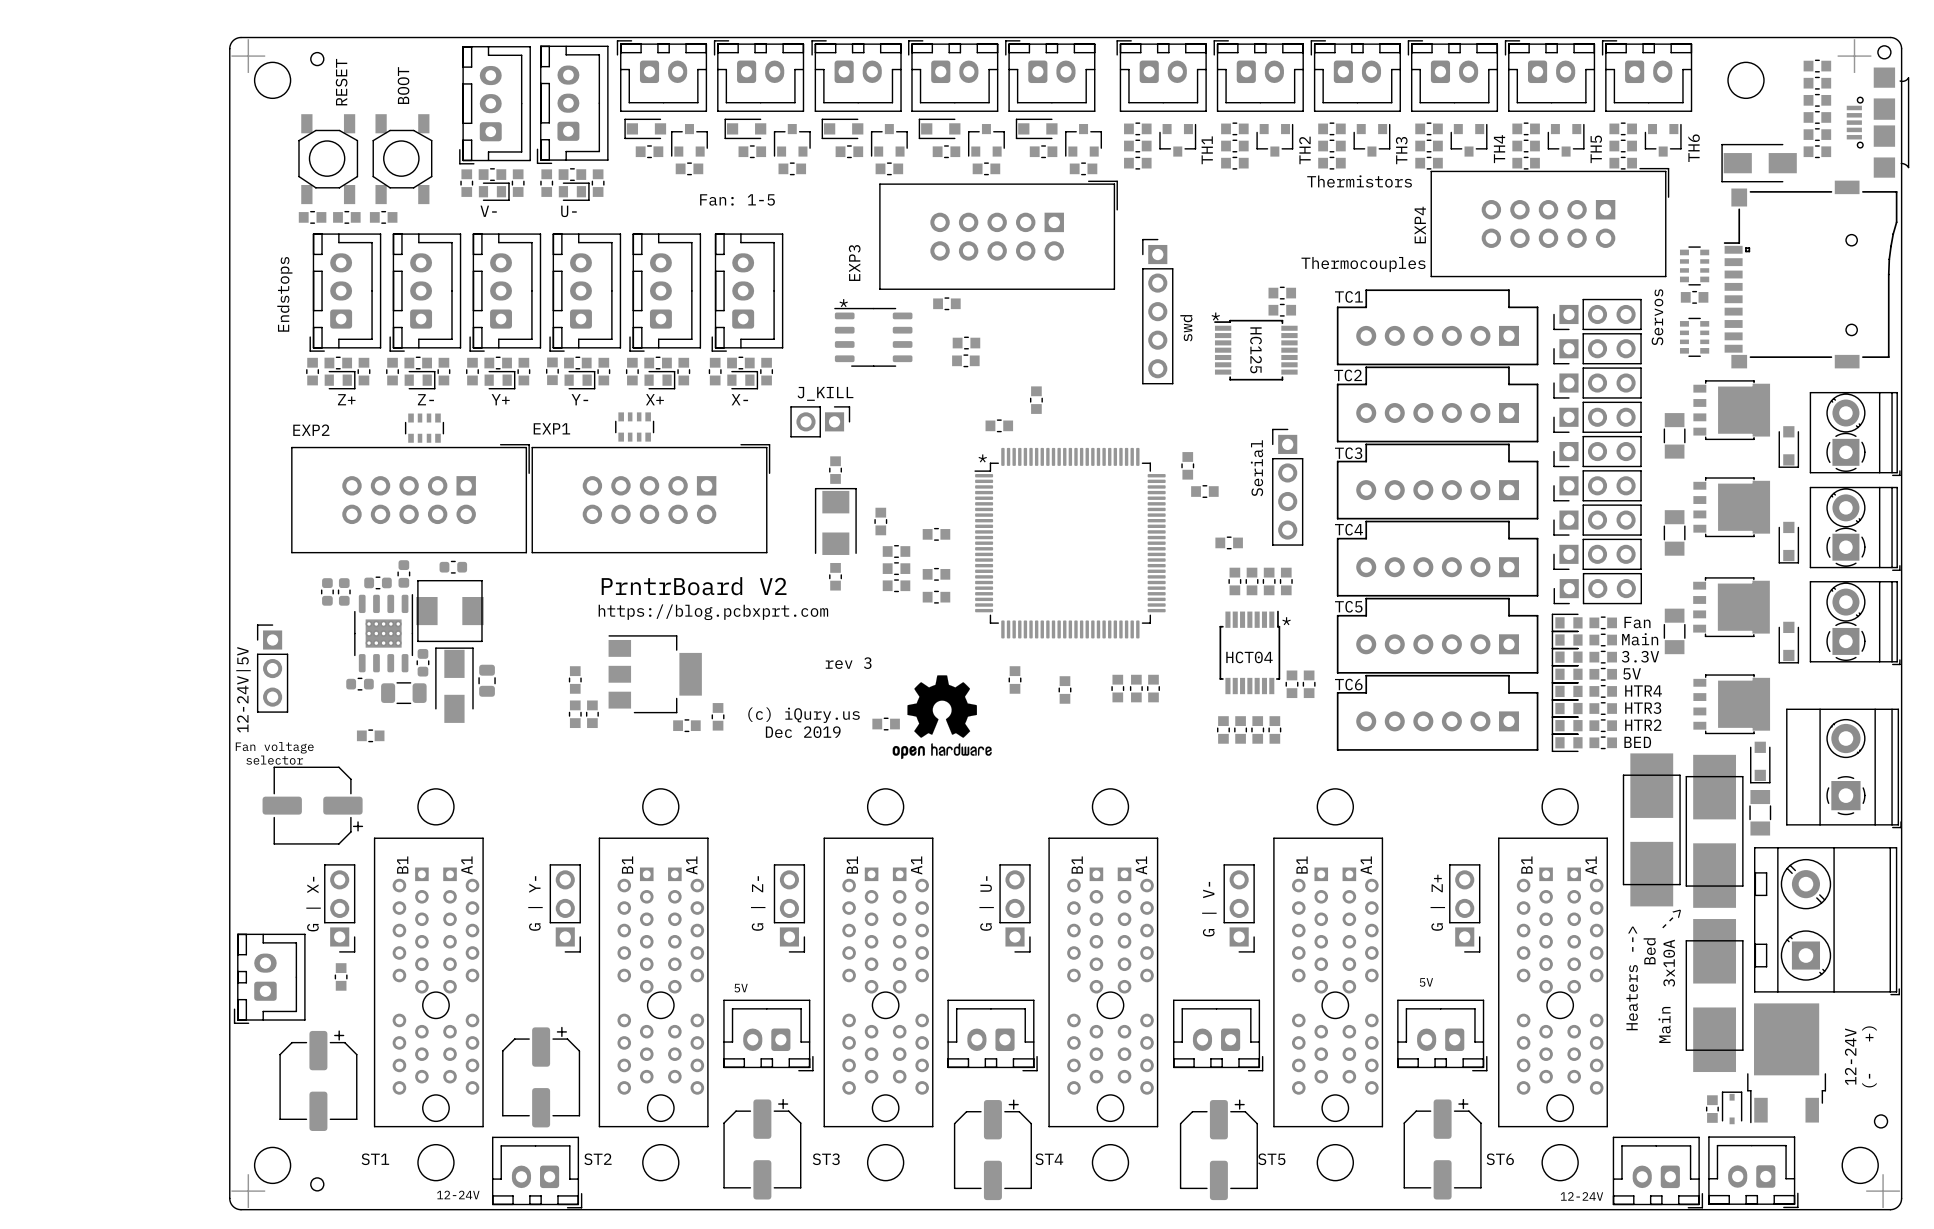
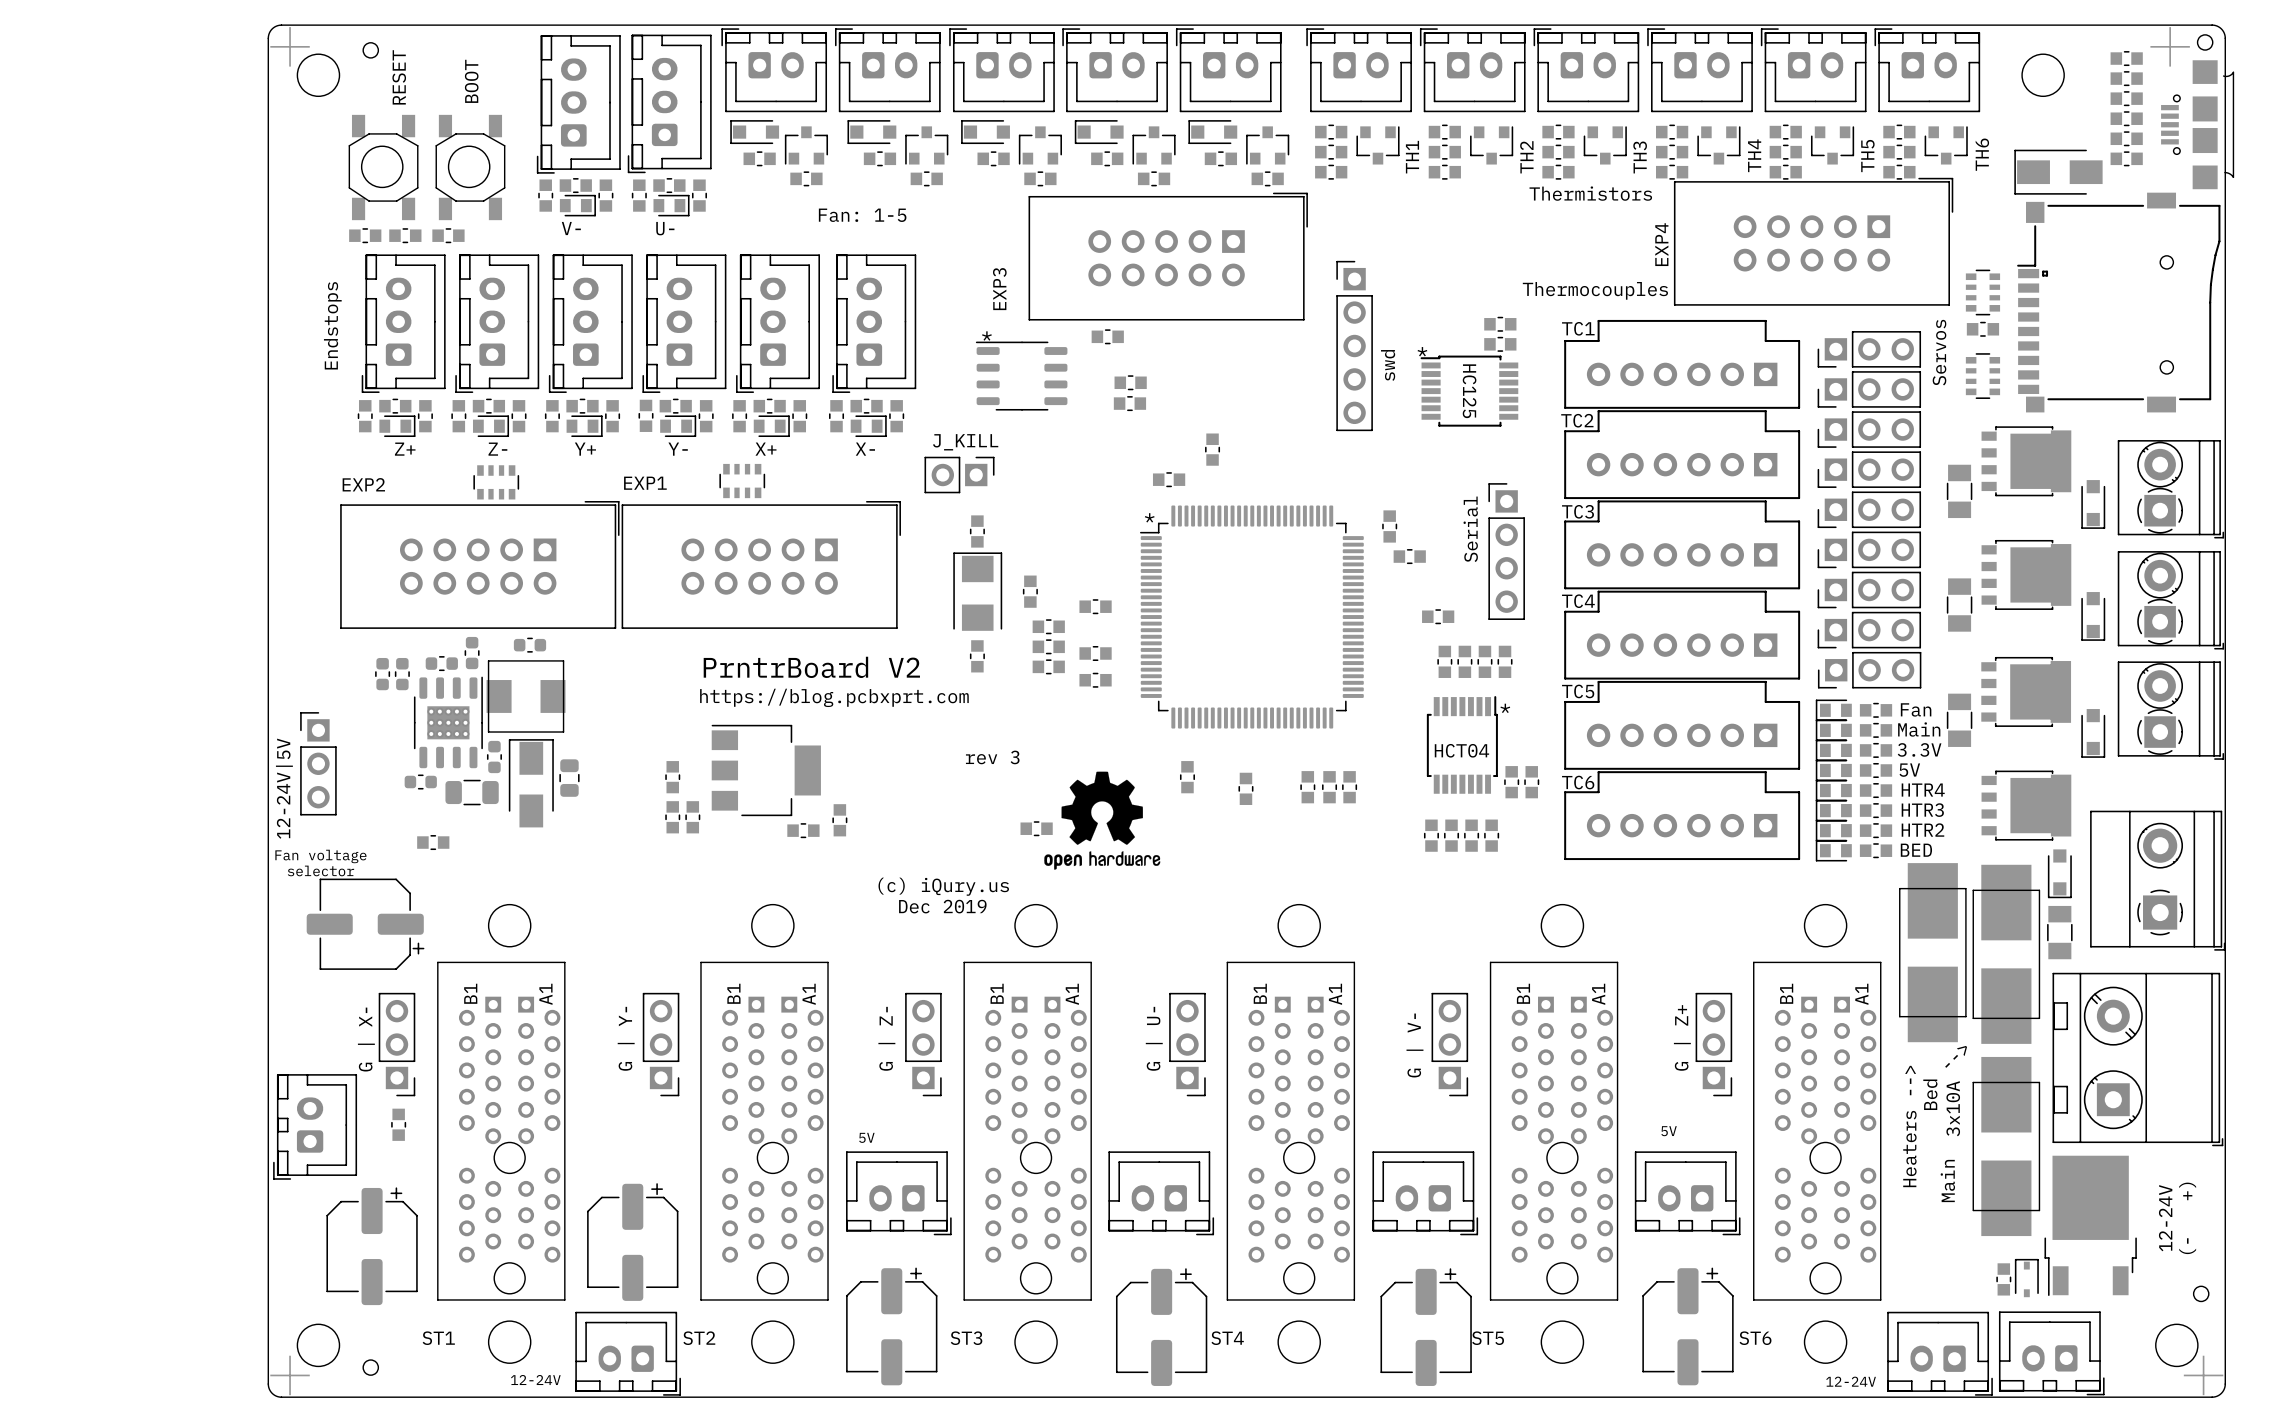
text position: (c) iQury.us (804, 715) -> (c) iQury.us (943, 886)
text position: Dec 2019 (803, 732) -> Dec 2019 (942, 906)

